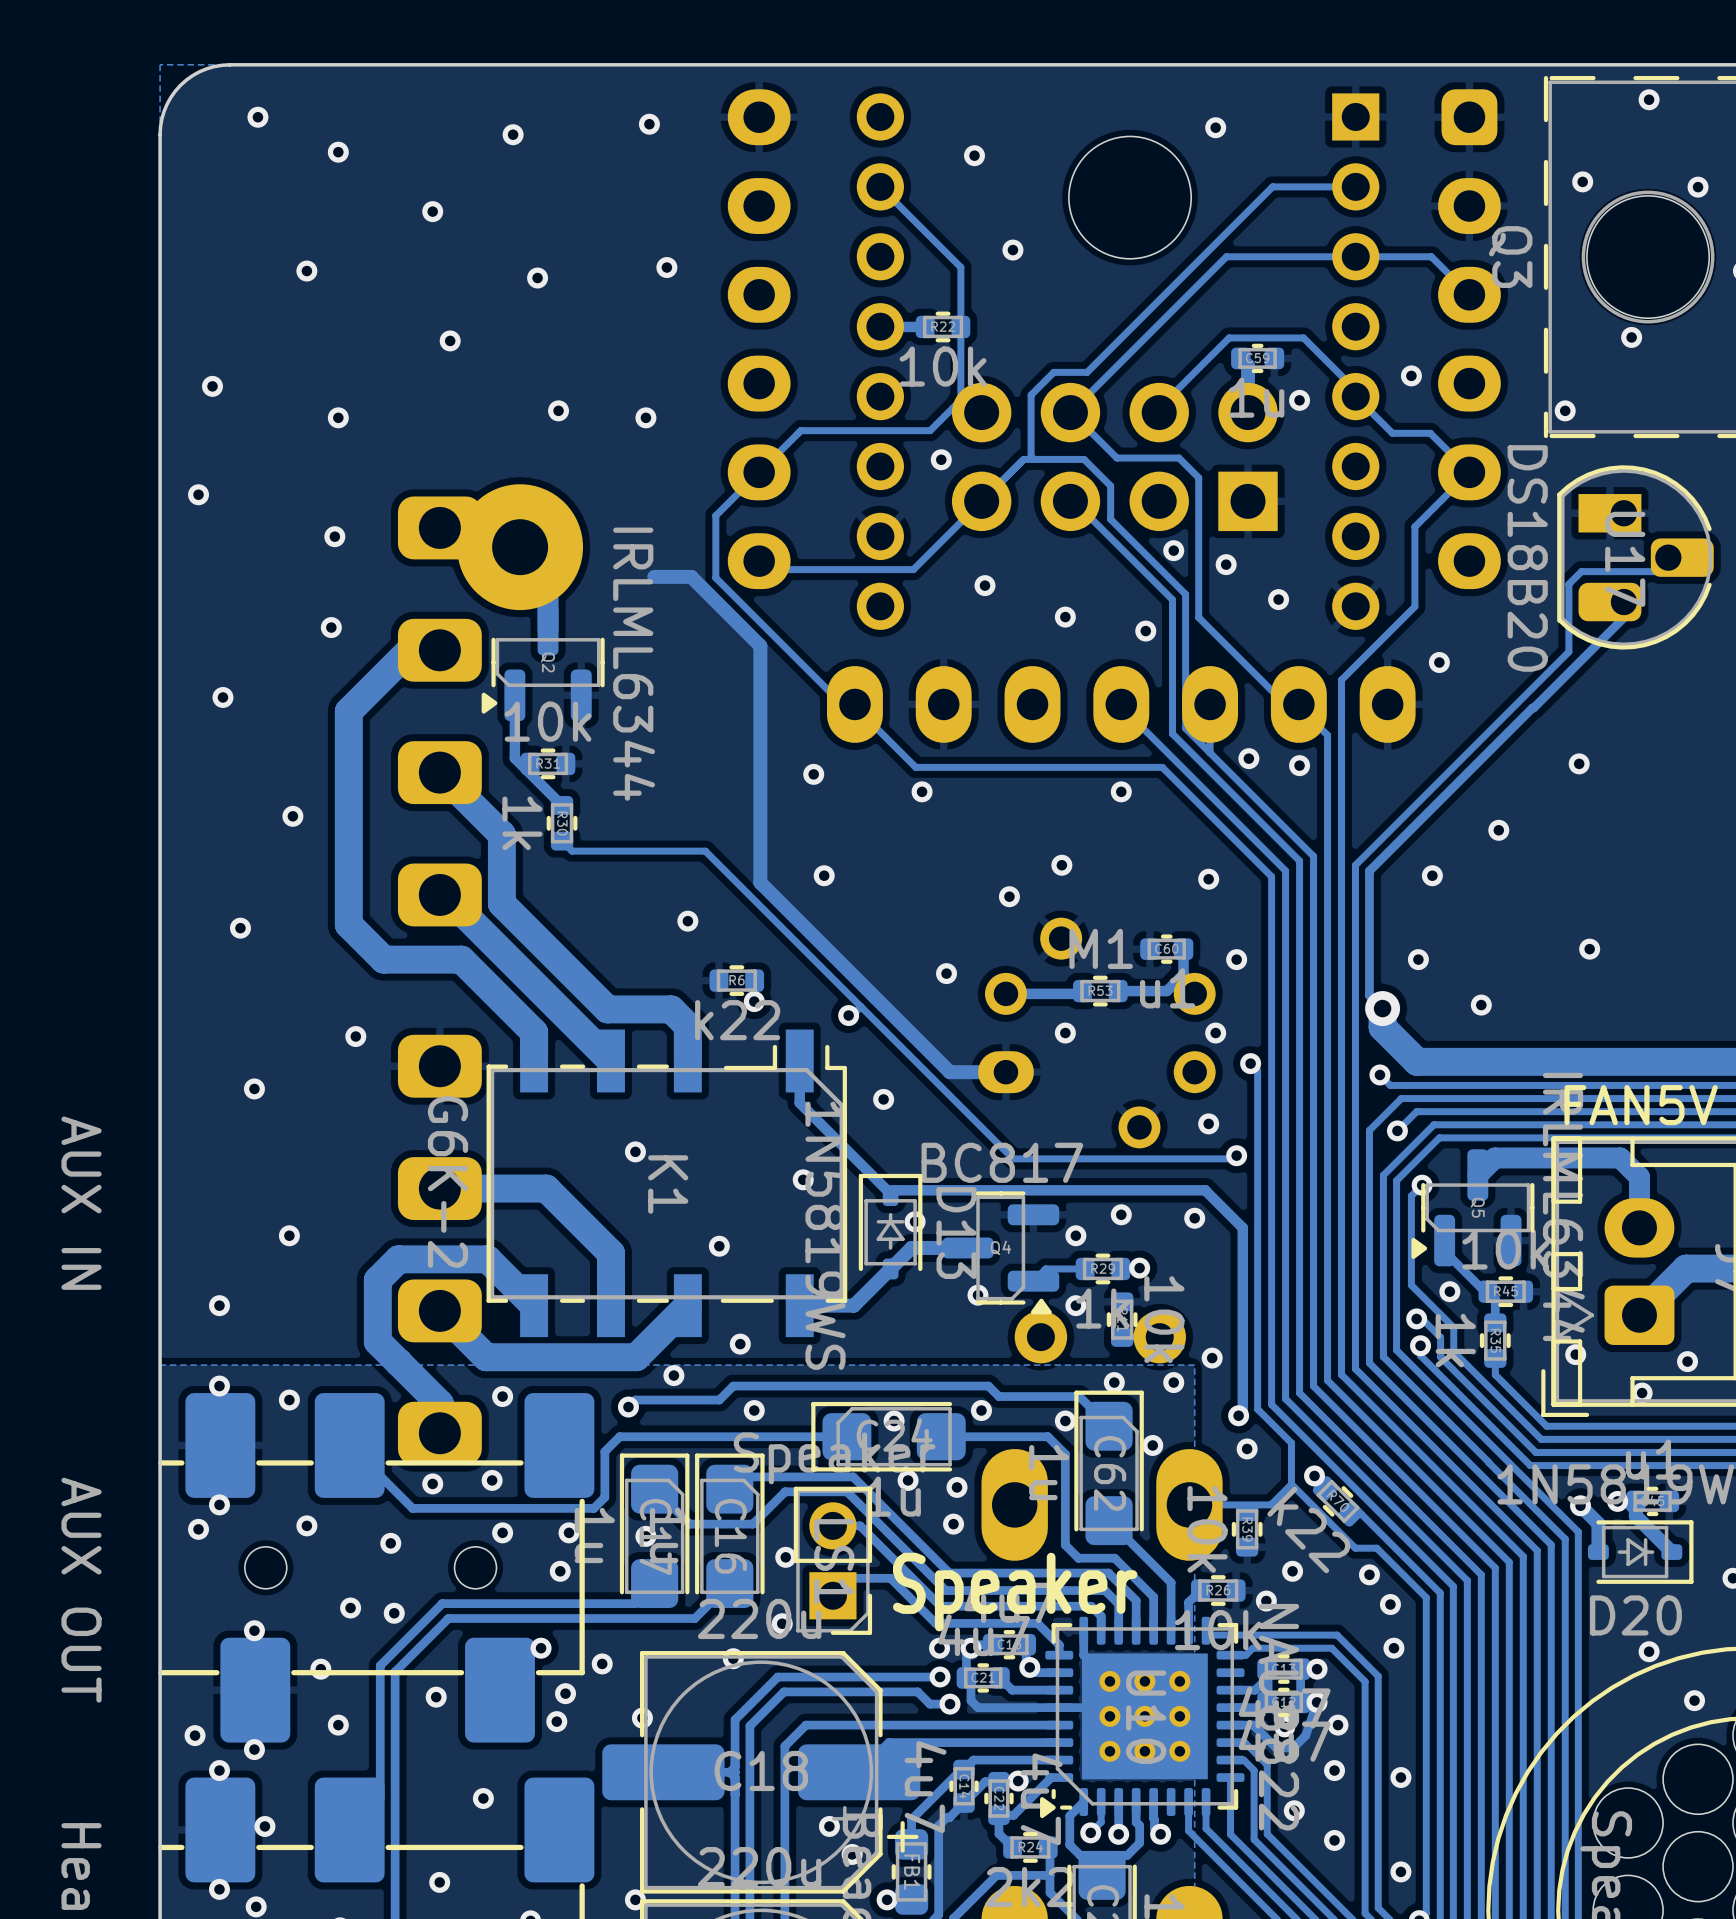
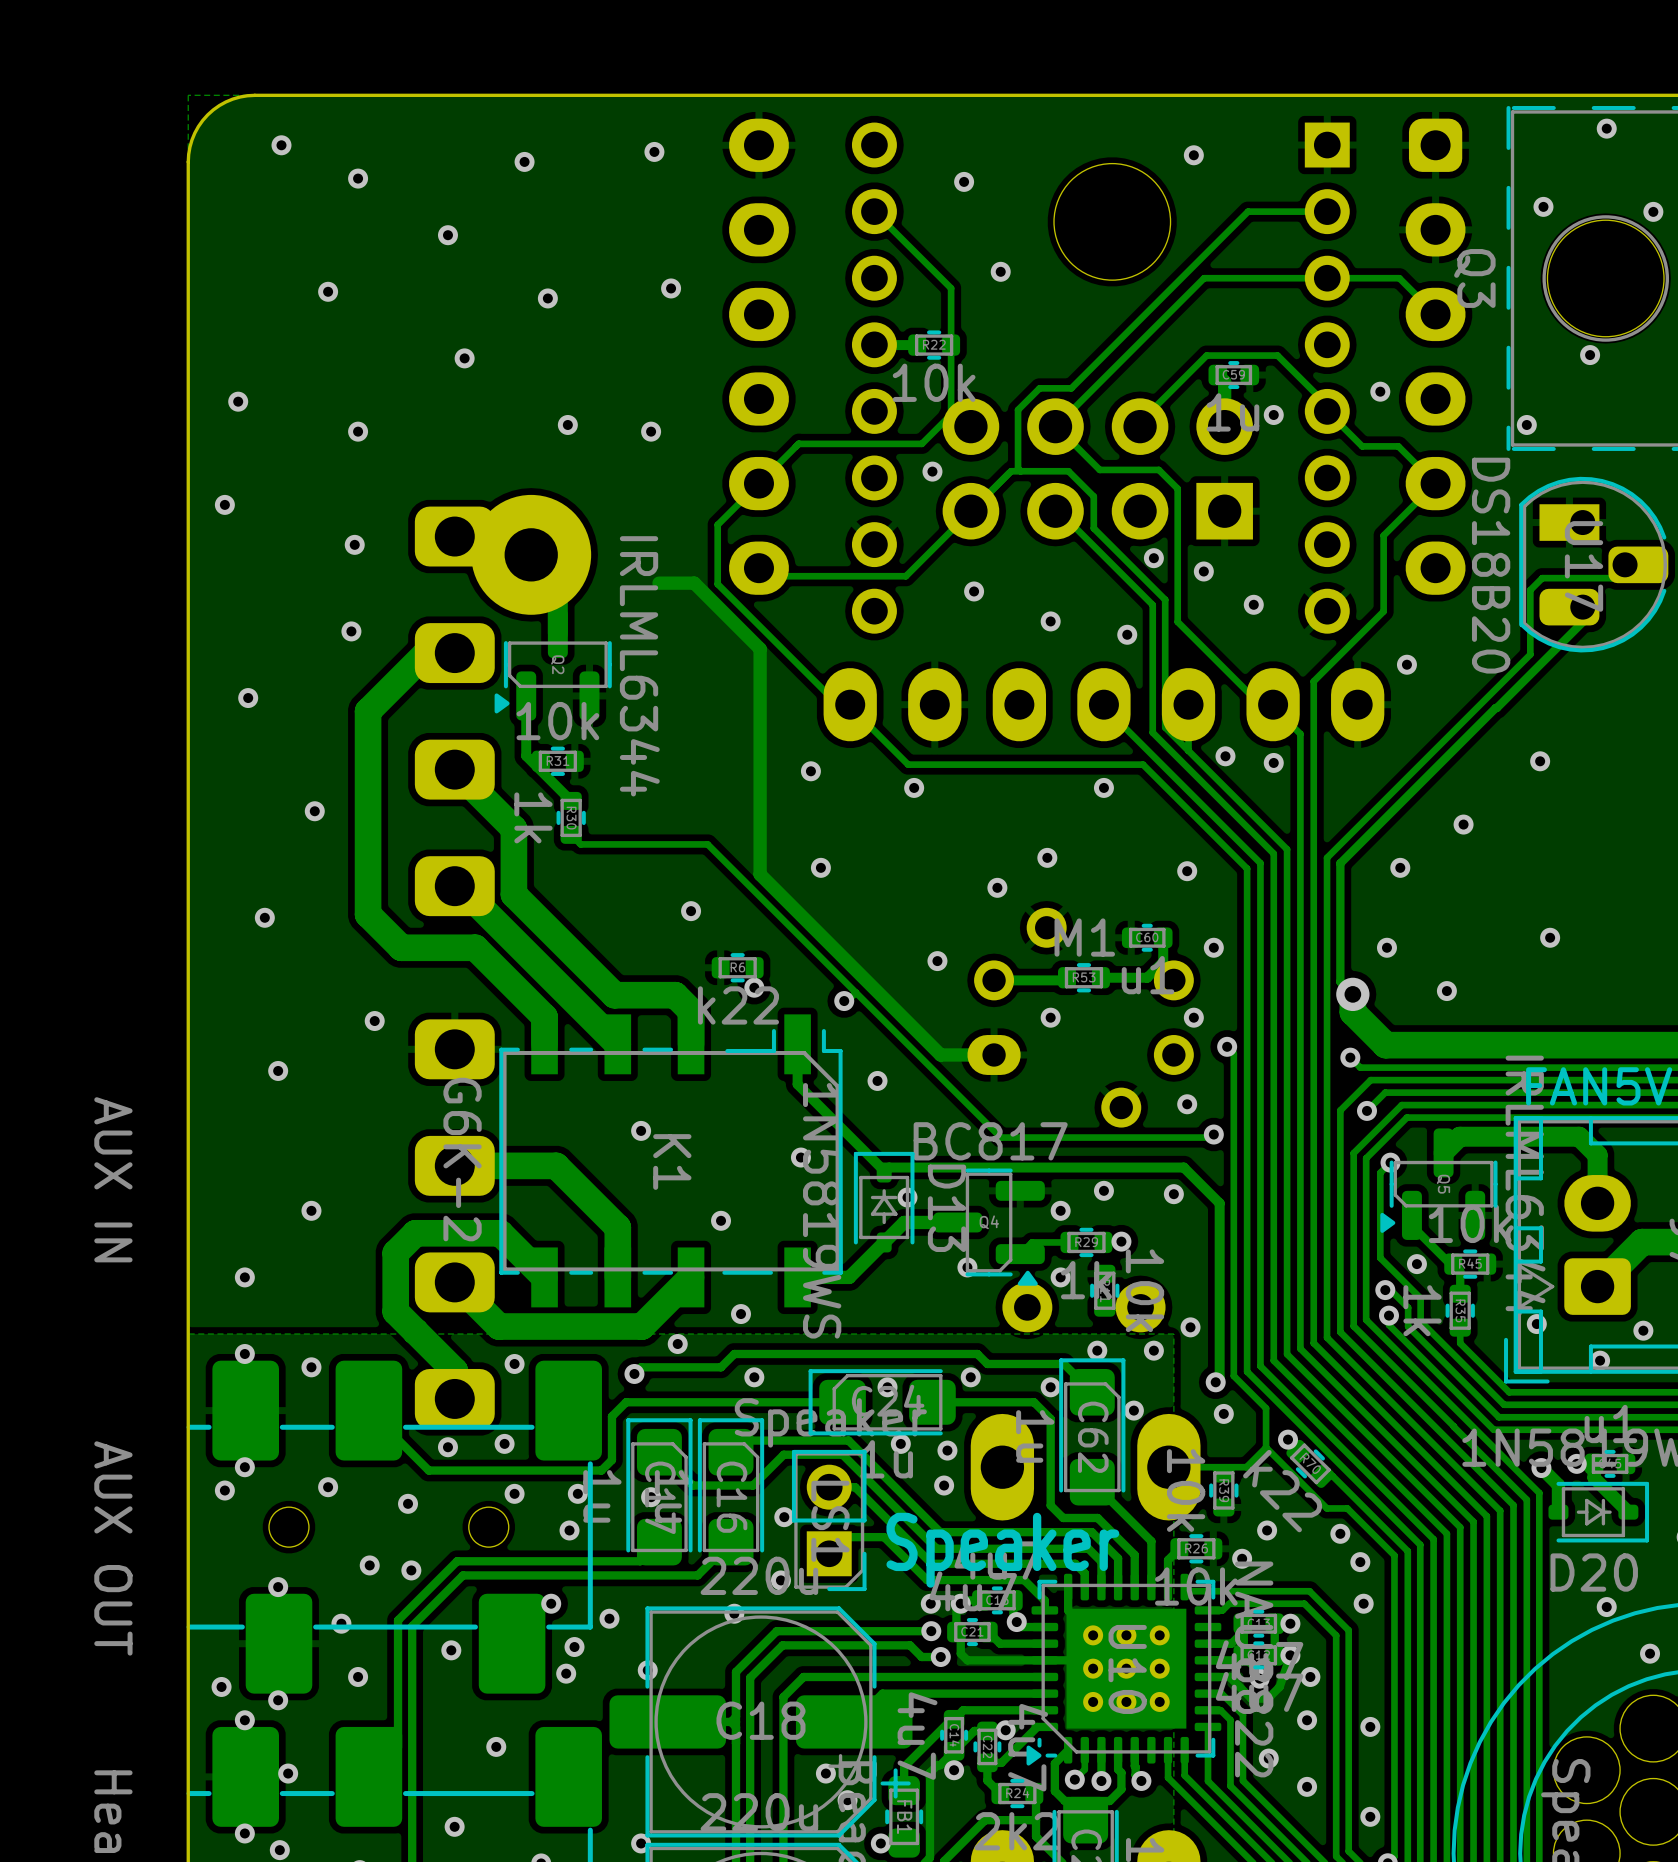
via: none -> (954, 1770)

